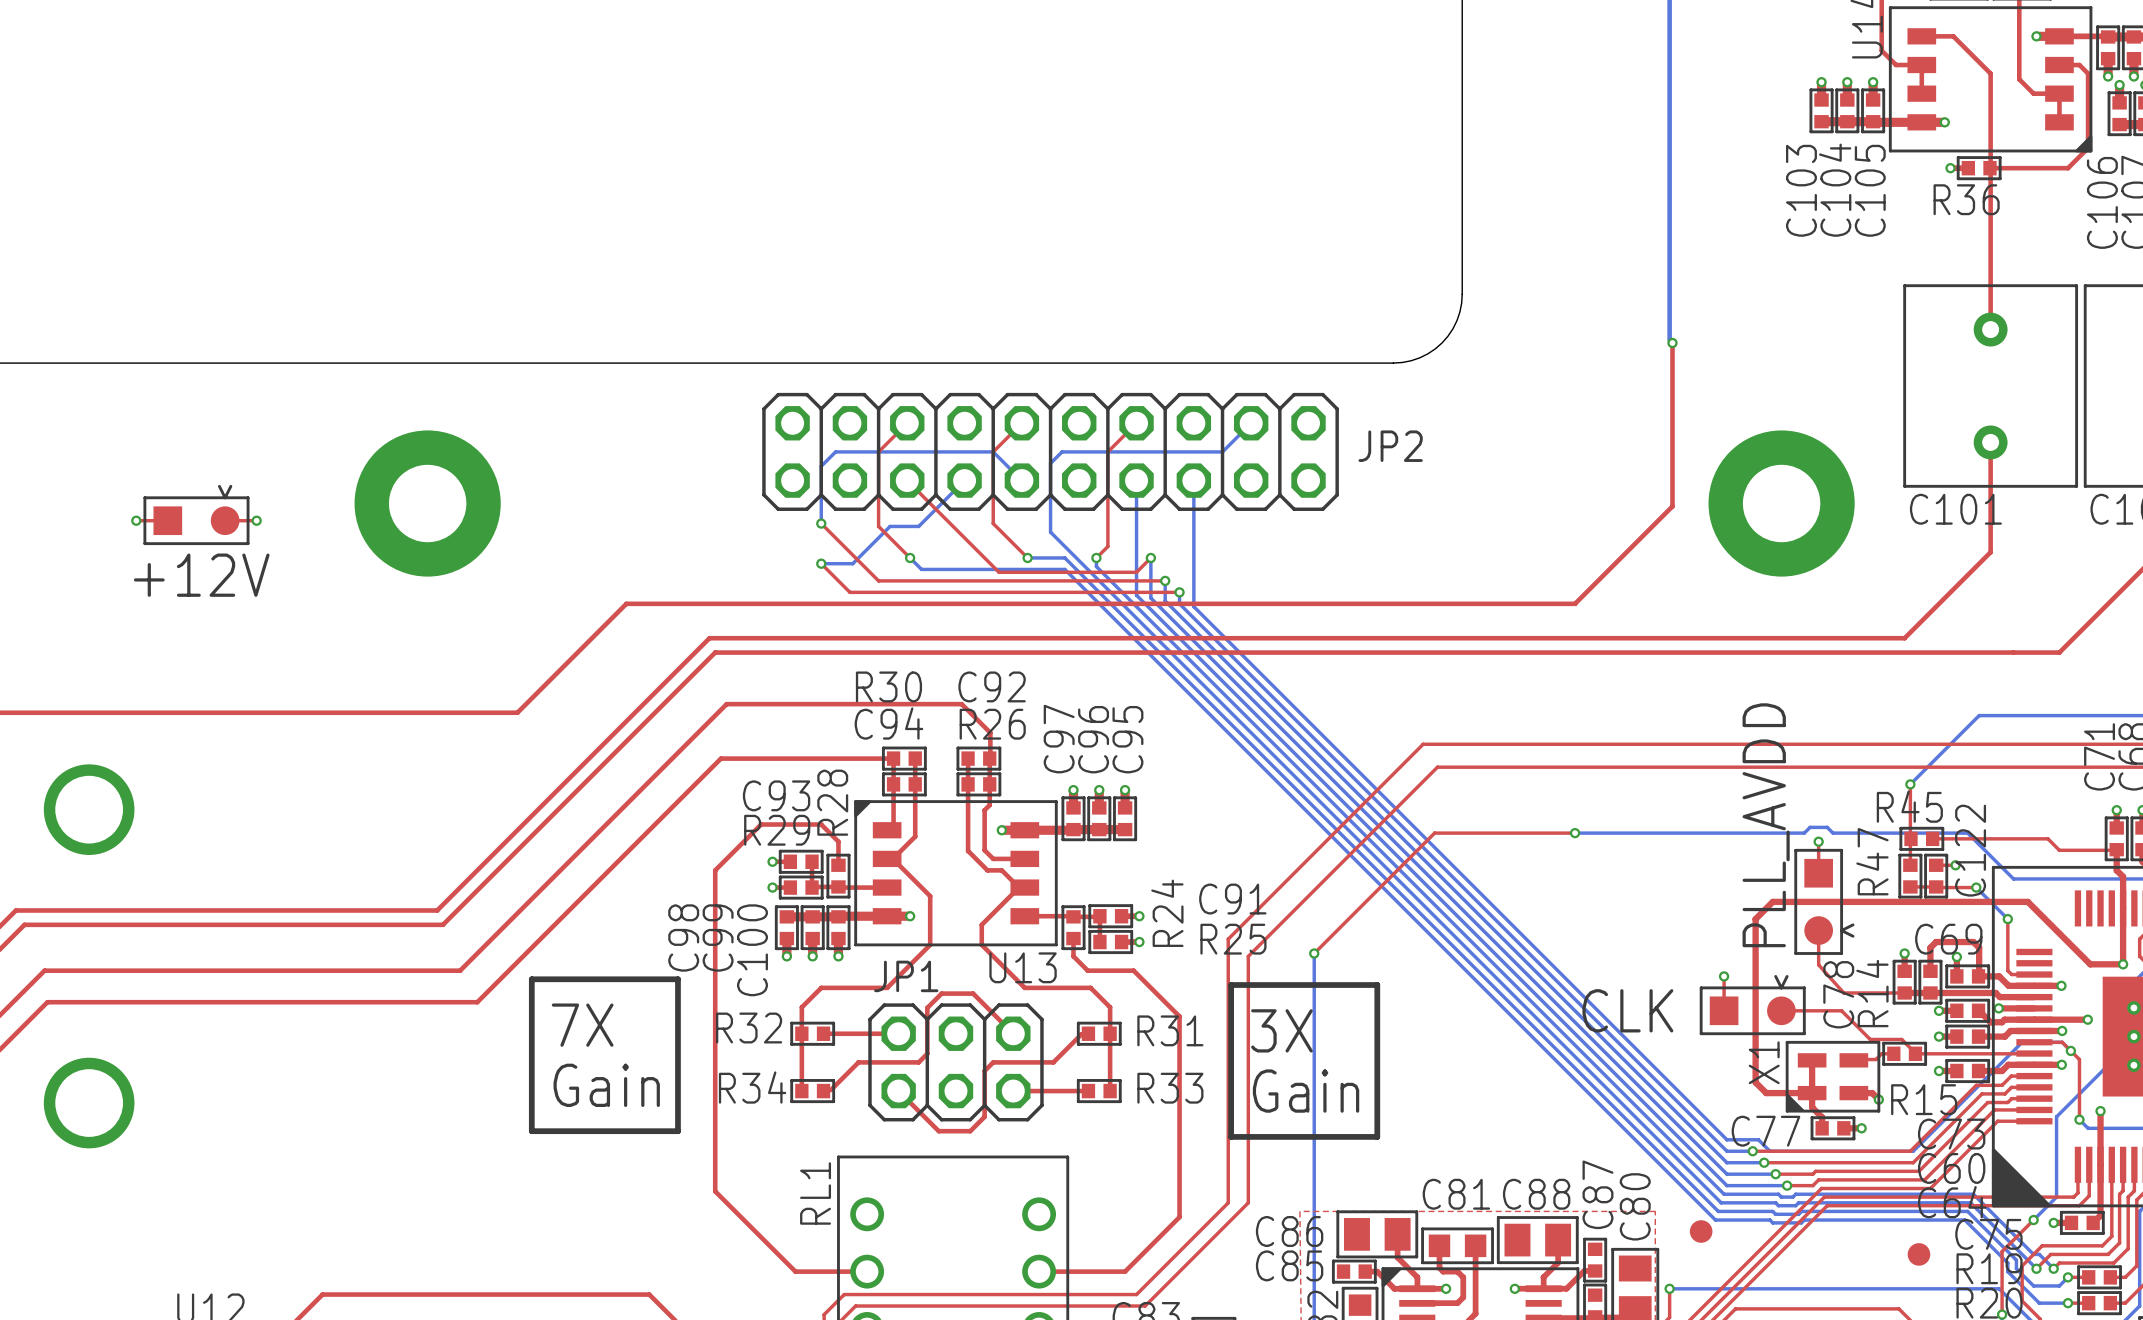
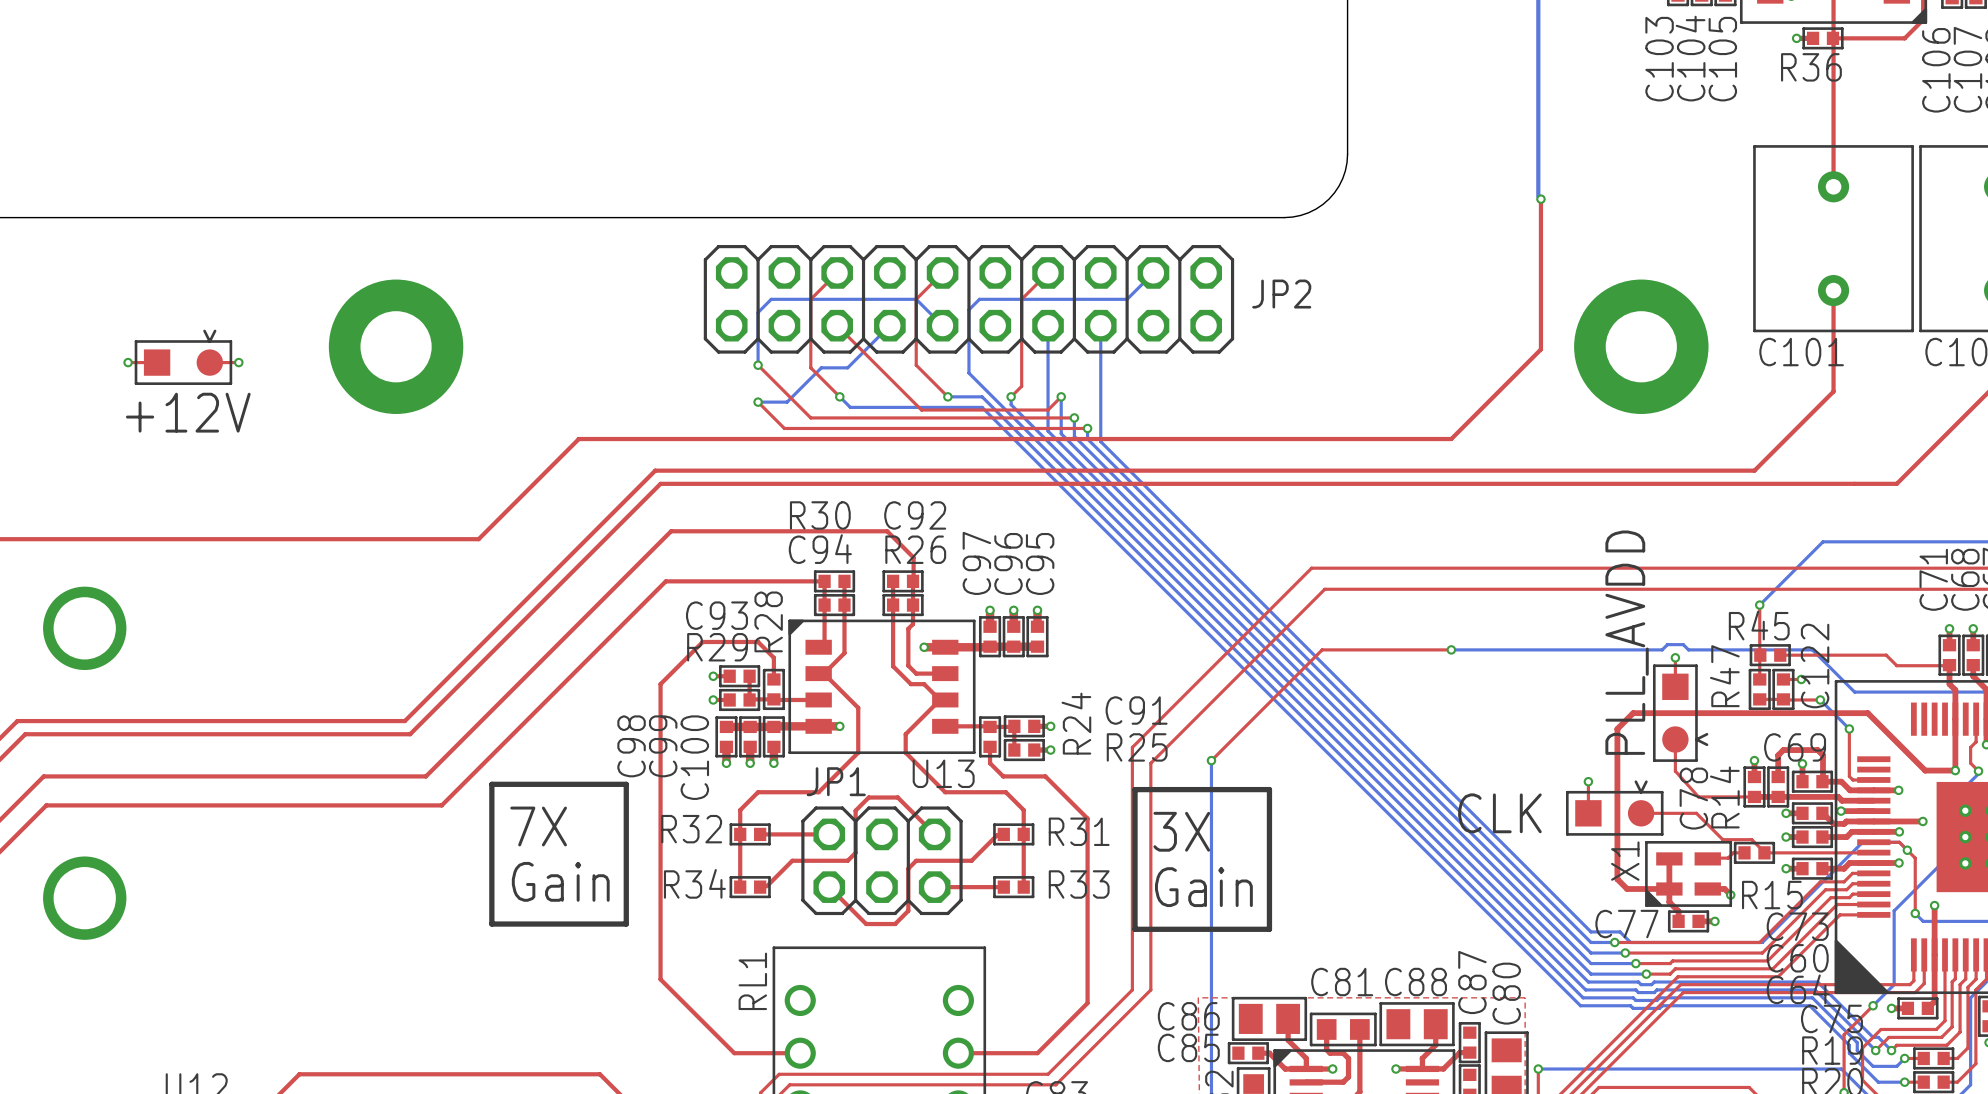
part: (1701, 1231) -> none
part: (1918, 1254) -> none

